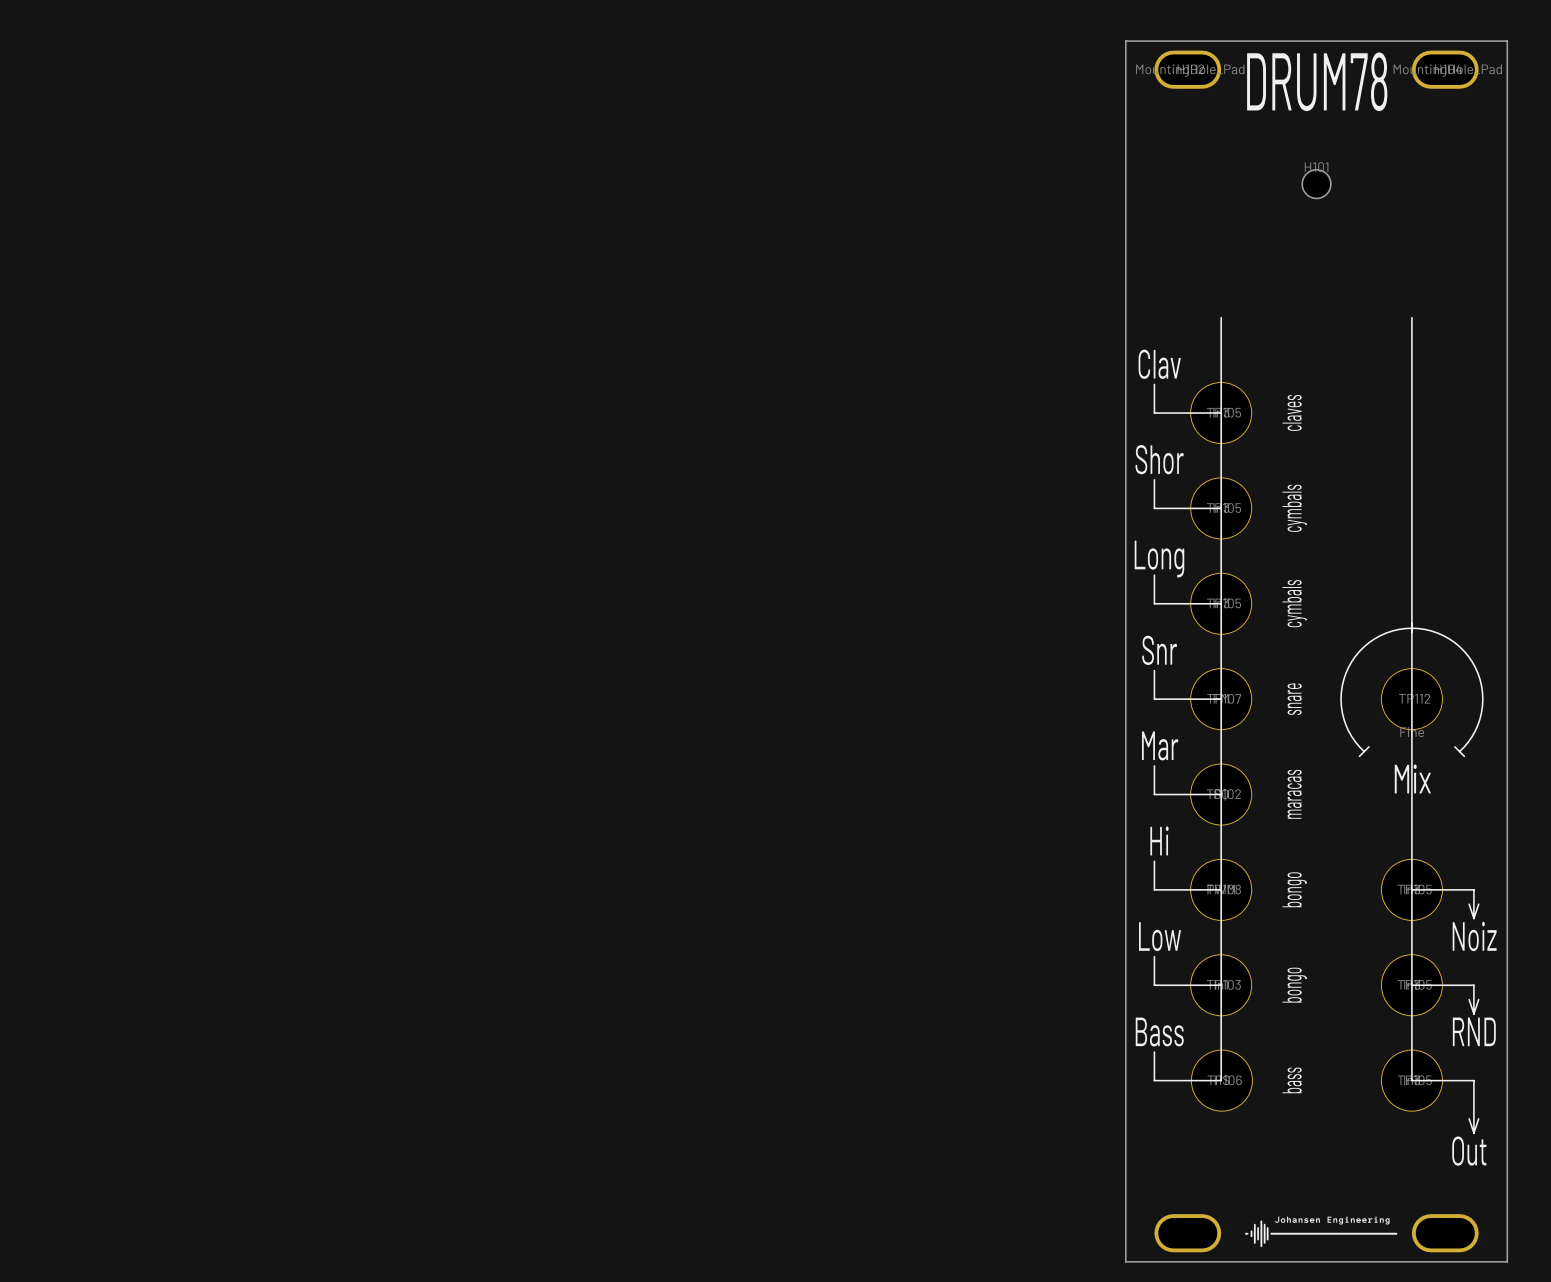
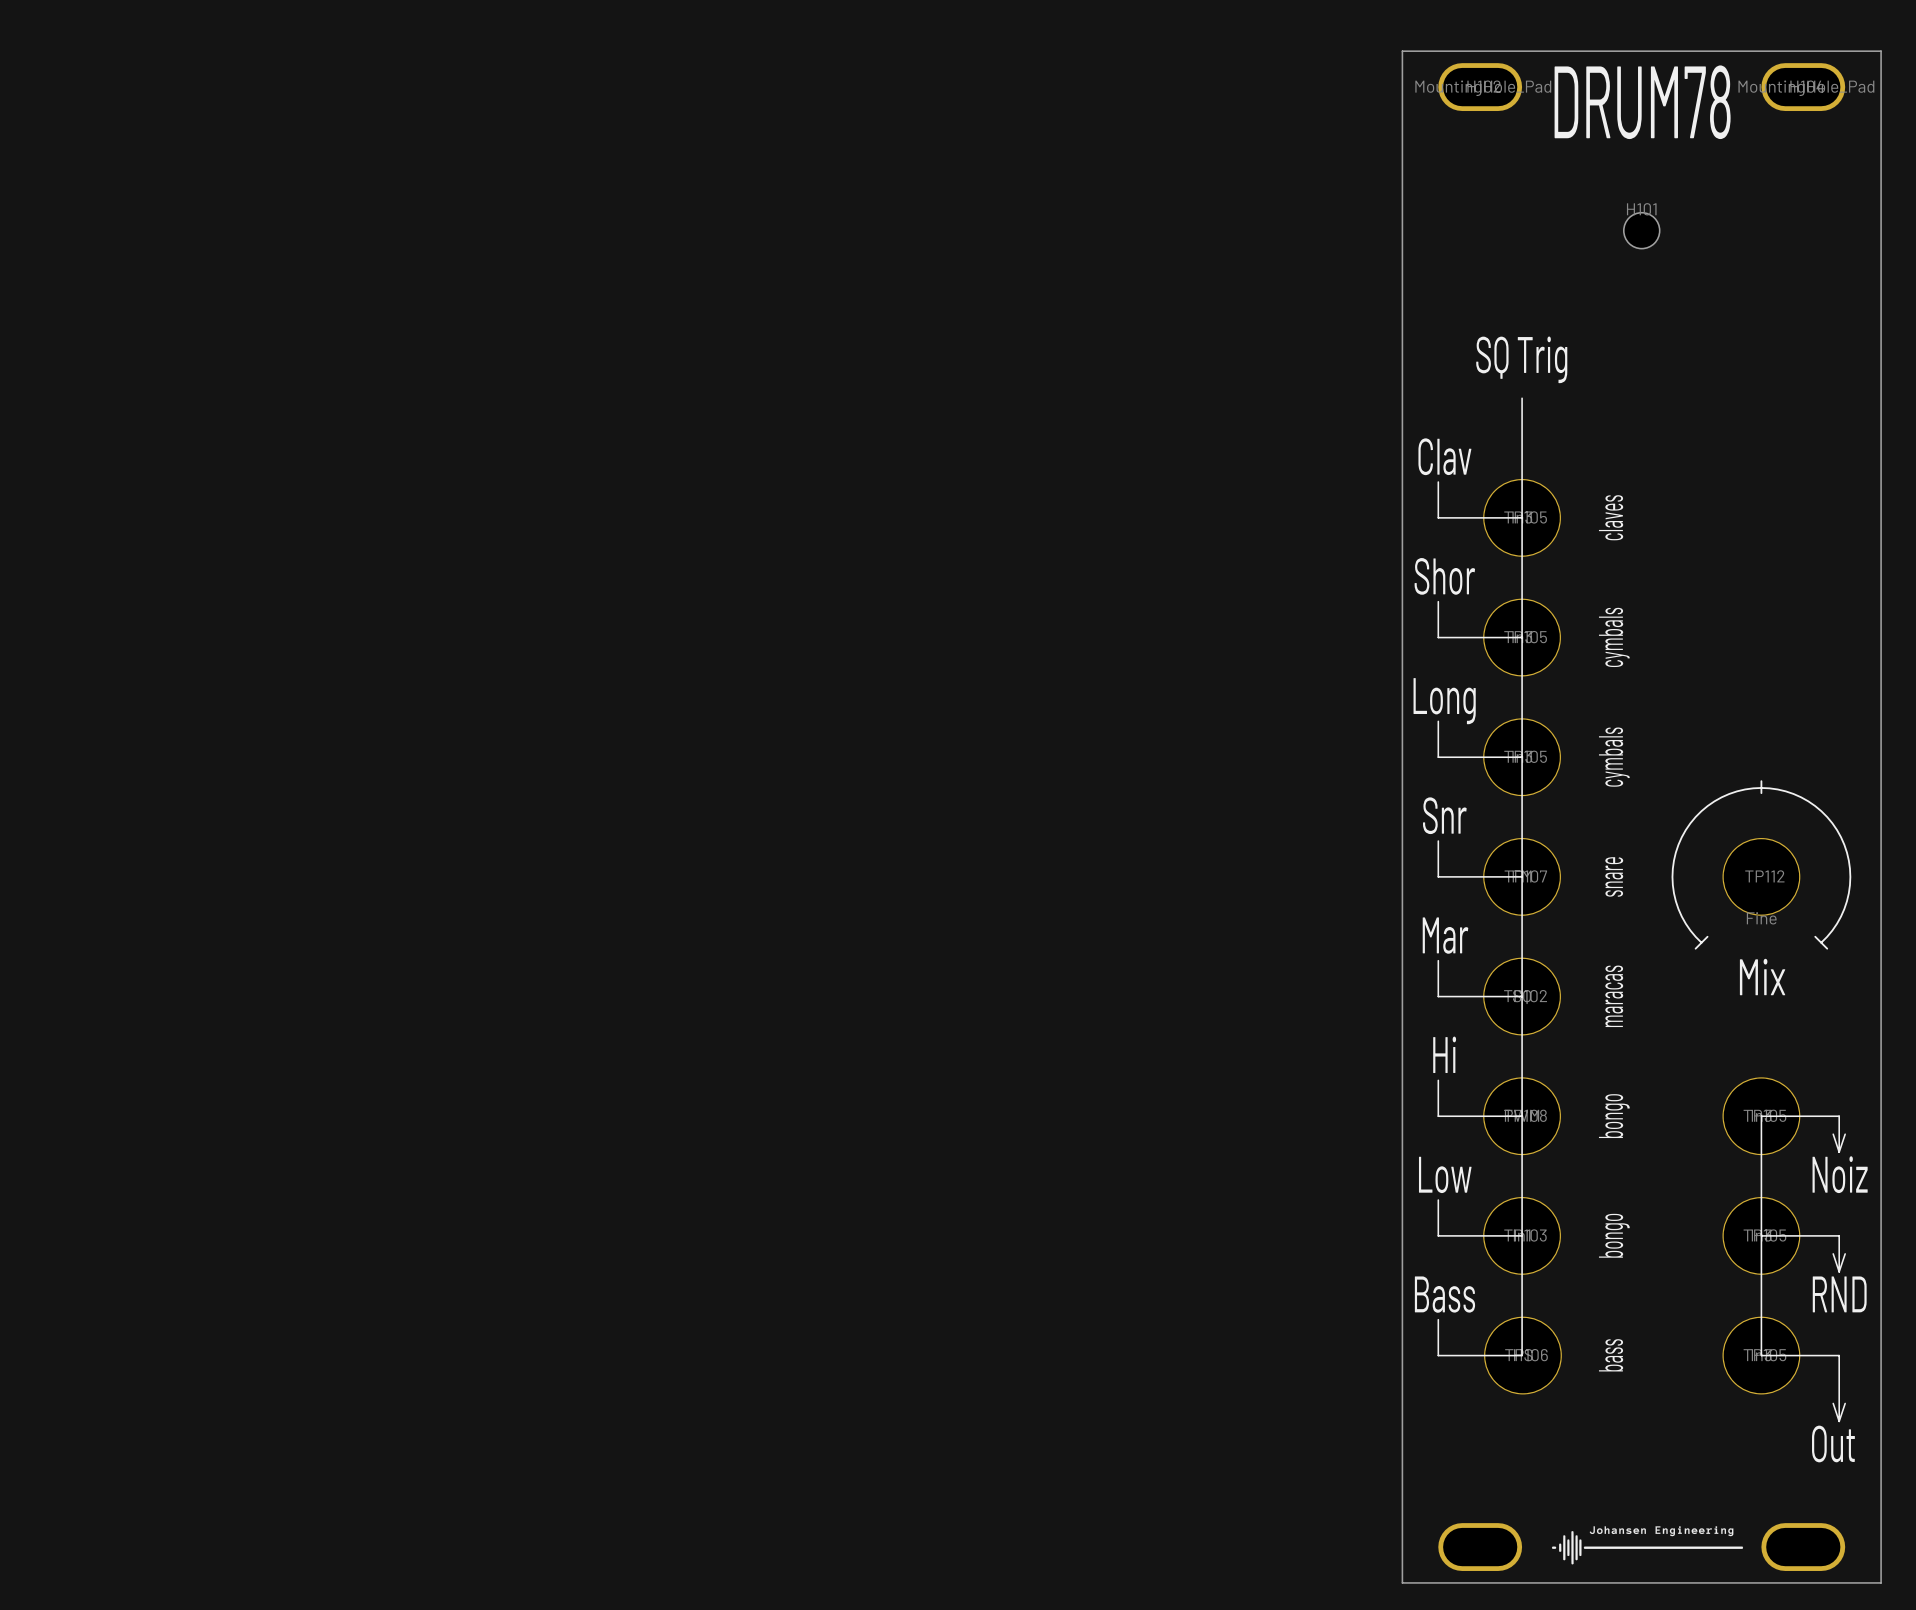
text: none -> SQ Trig (1521, 359)
line: (1411, 317) (1411, 889) -> none

